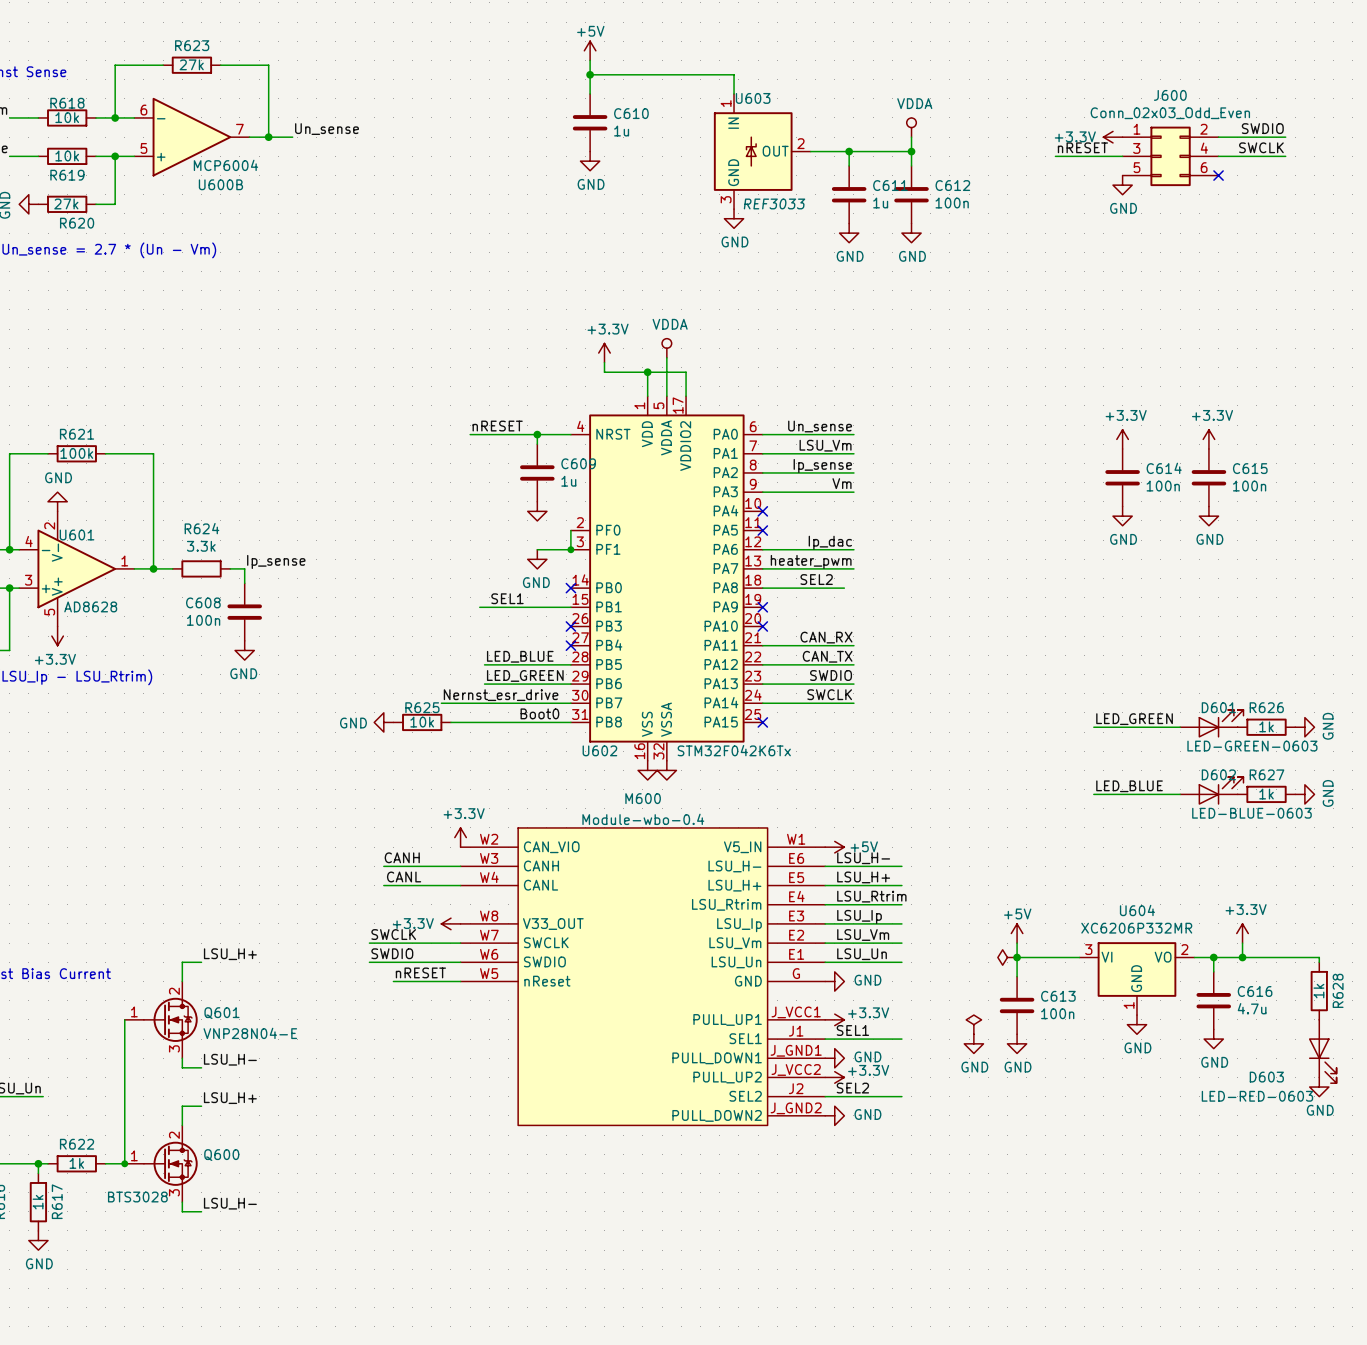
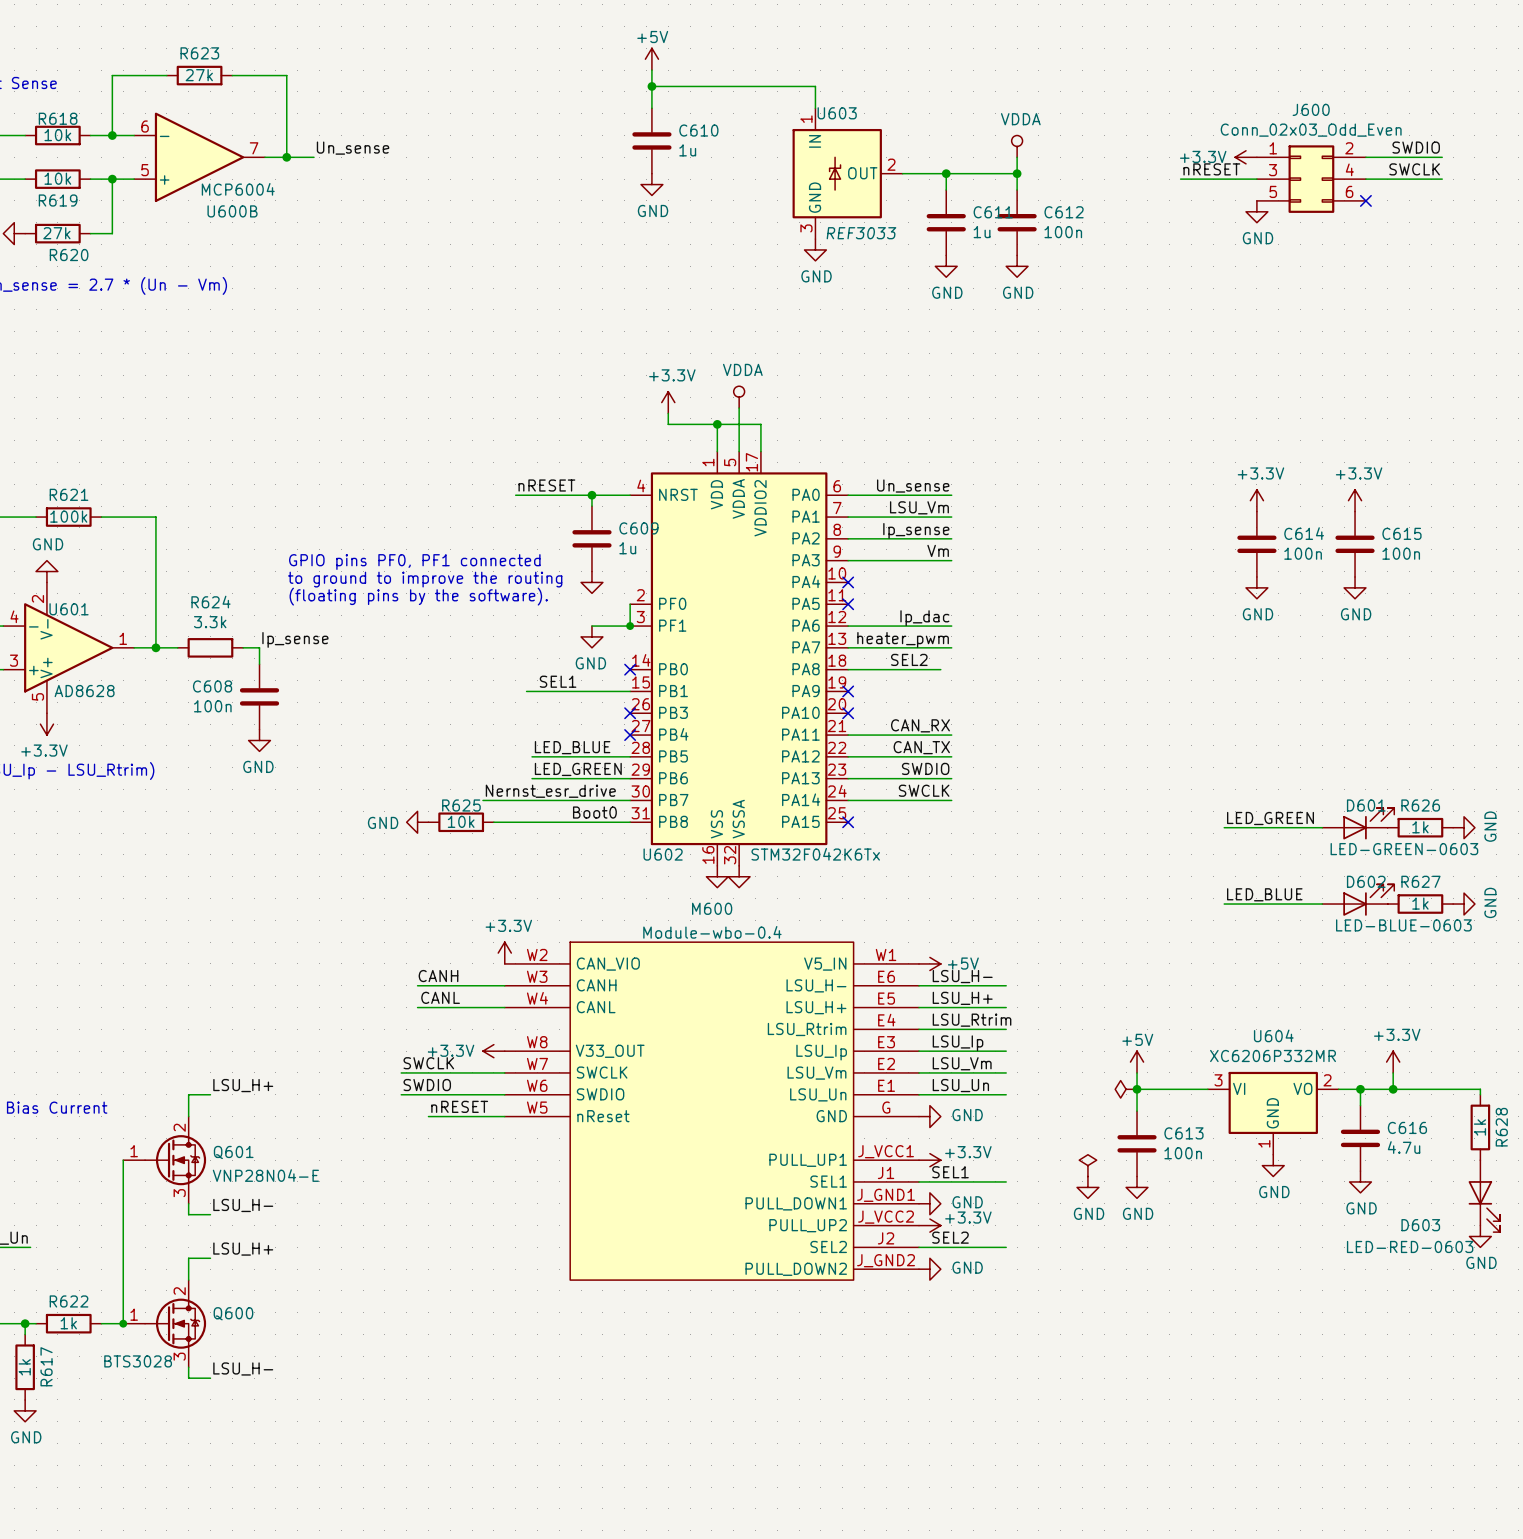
text: none -> GPIO pins PF0, PF1 connected (414, 562)
text: none -> to ground to improve the routing (425, 579)
text: none -> (floating pins by the software). (418, 596)

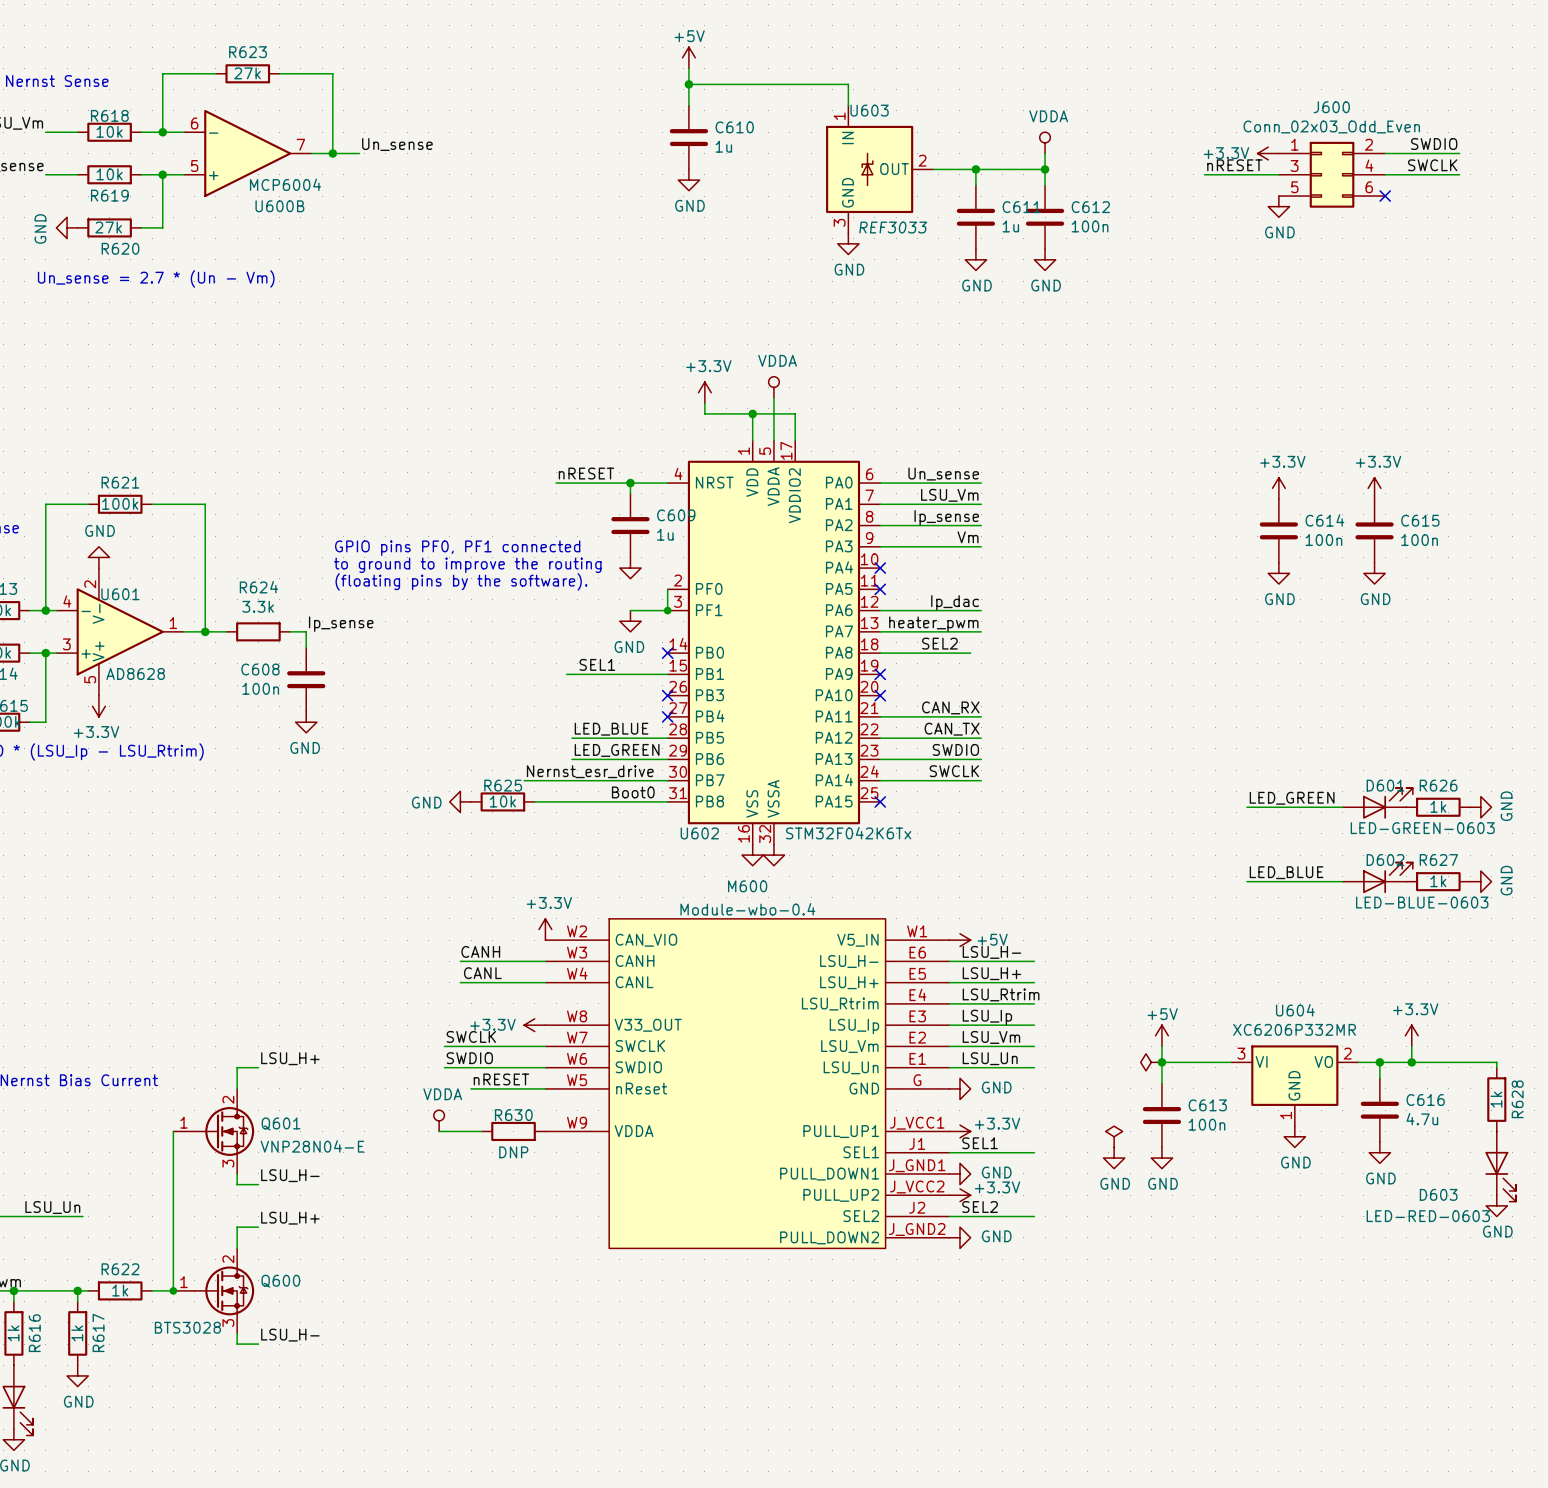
M600 symbol: [504, 942, 920, 1281] -> [545, 918, 950, 1249]
power symbol: none -> VDDA (439, 1120)
wire: none -> (439, 1131) (481, 1131)
R630: none -> DNP (513, 1131)

